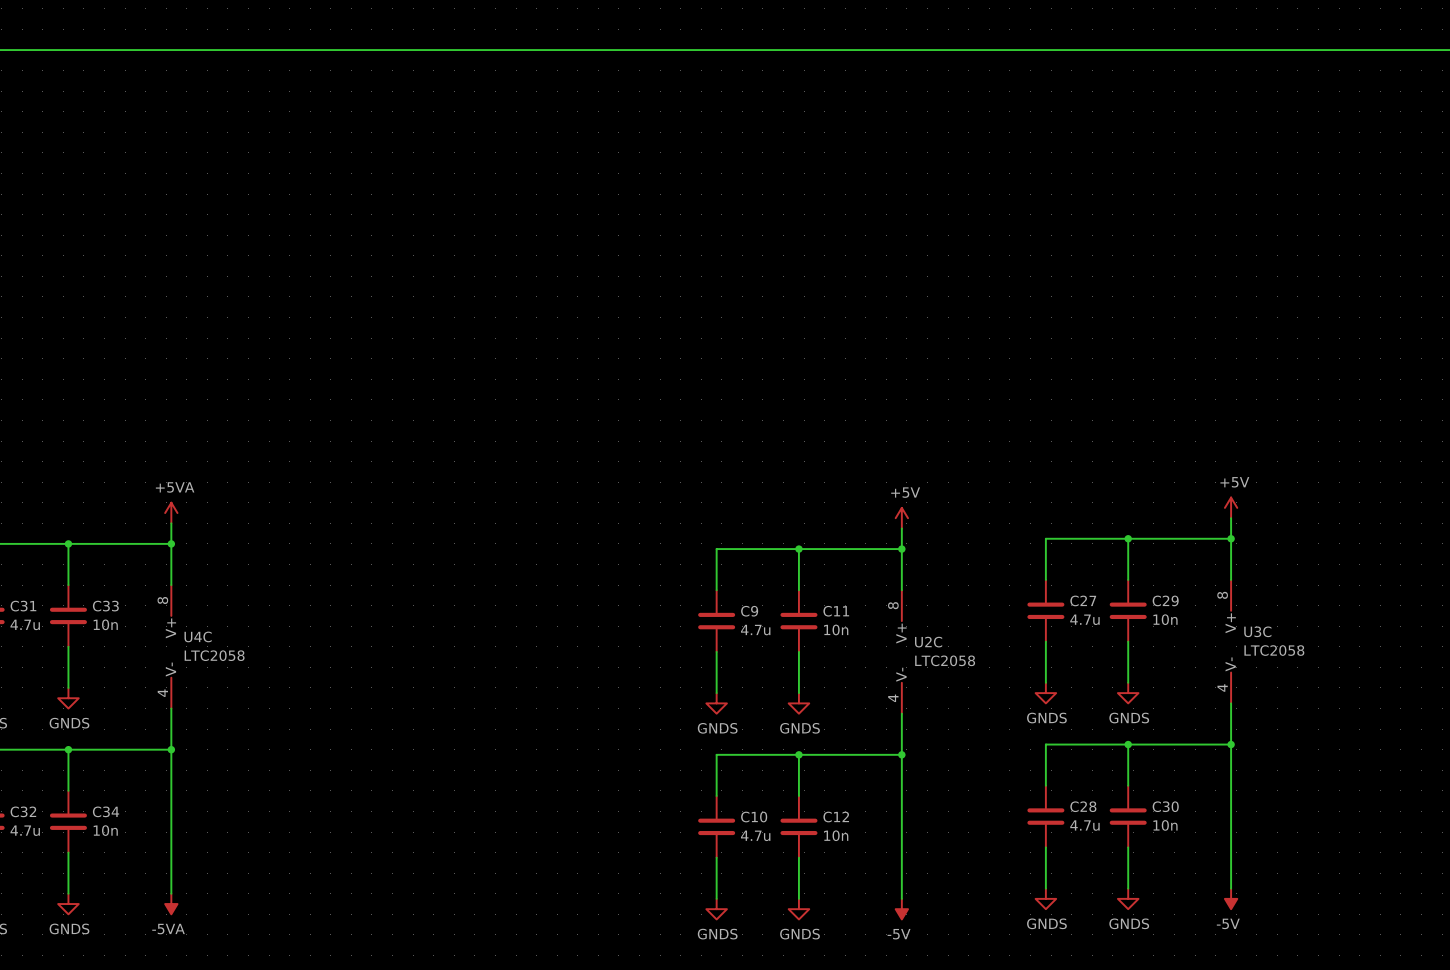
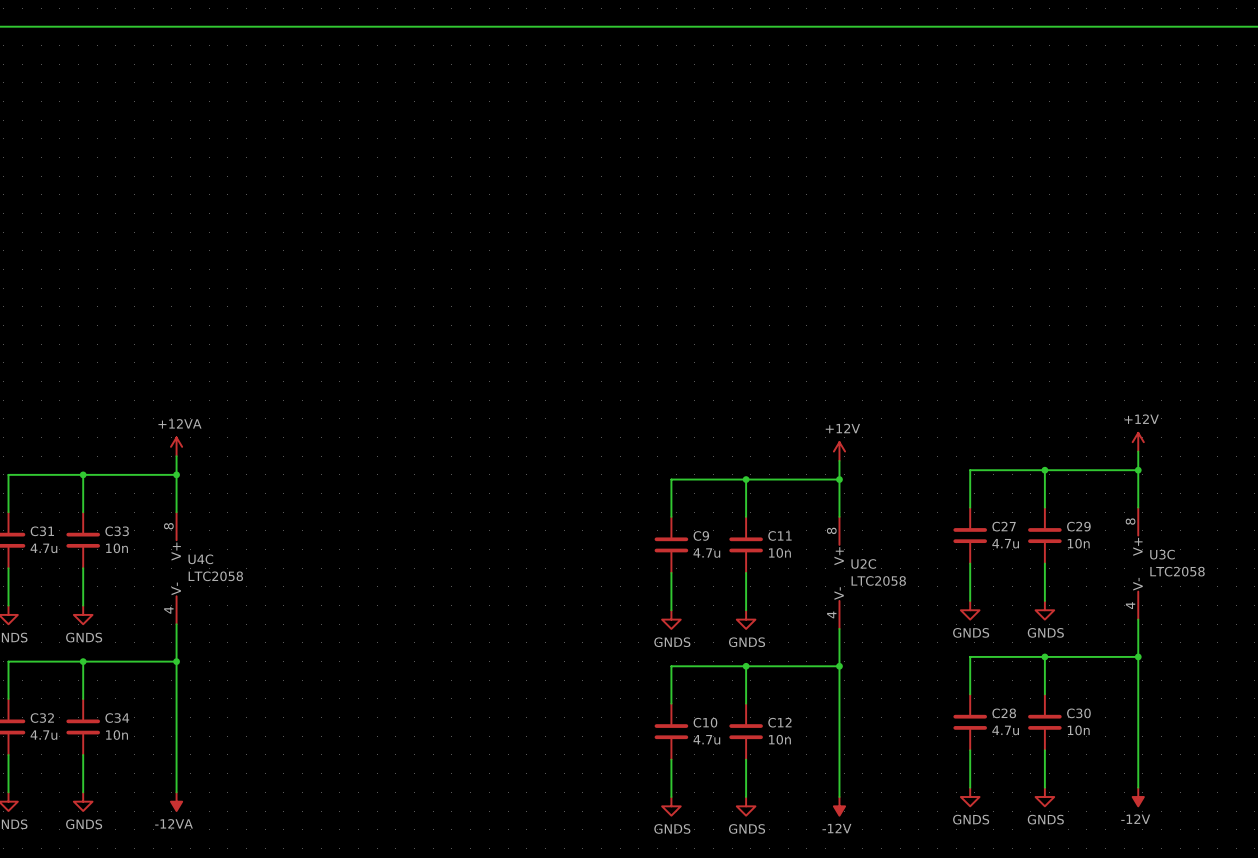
power symbol: +5V (1231, 507) -> +12V (1138, 442)
power symbol: +5VA (171, 513) -> +12VA (176, 446)
power symbol: +5V (901, 518) -> +12V (839, 451)
power symbol: -5V (1231, 898) -> -12V (1138, 797)
power symbol: -5VA (171, 904) -> -12VA (176, 801)
power symbol: -5V (901, 909) -> -12V (839, 806)

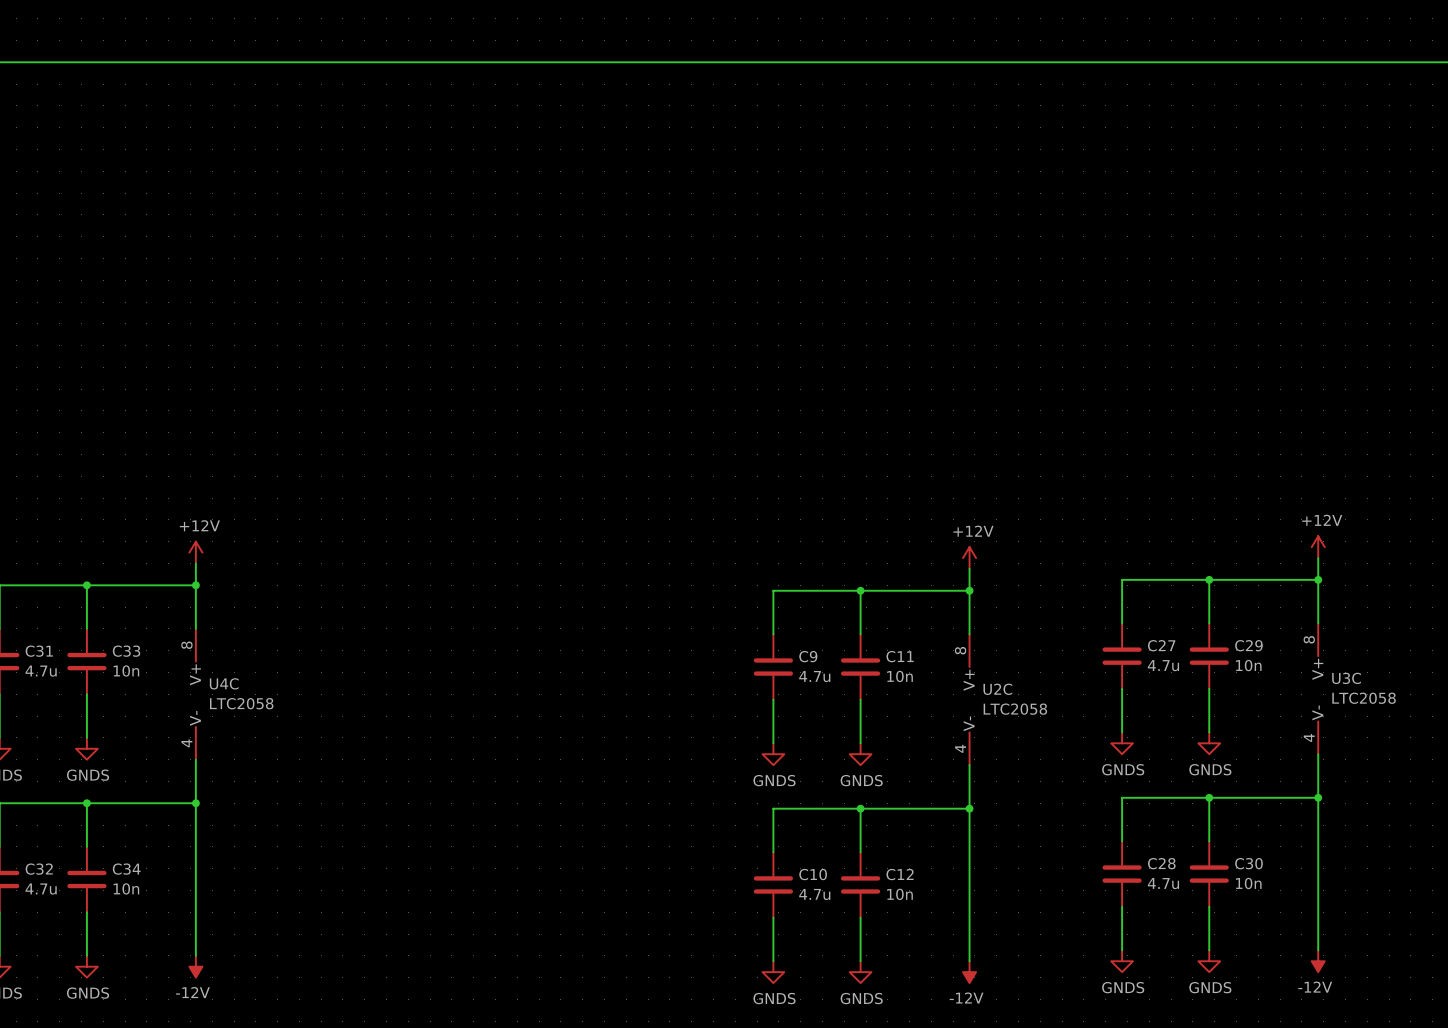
power symbol: +12VA (176, 446) -> +12V (195, 552)
power symbol: -12VA (176, 801) -> -12V (195, 966)

